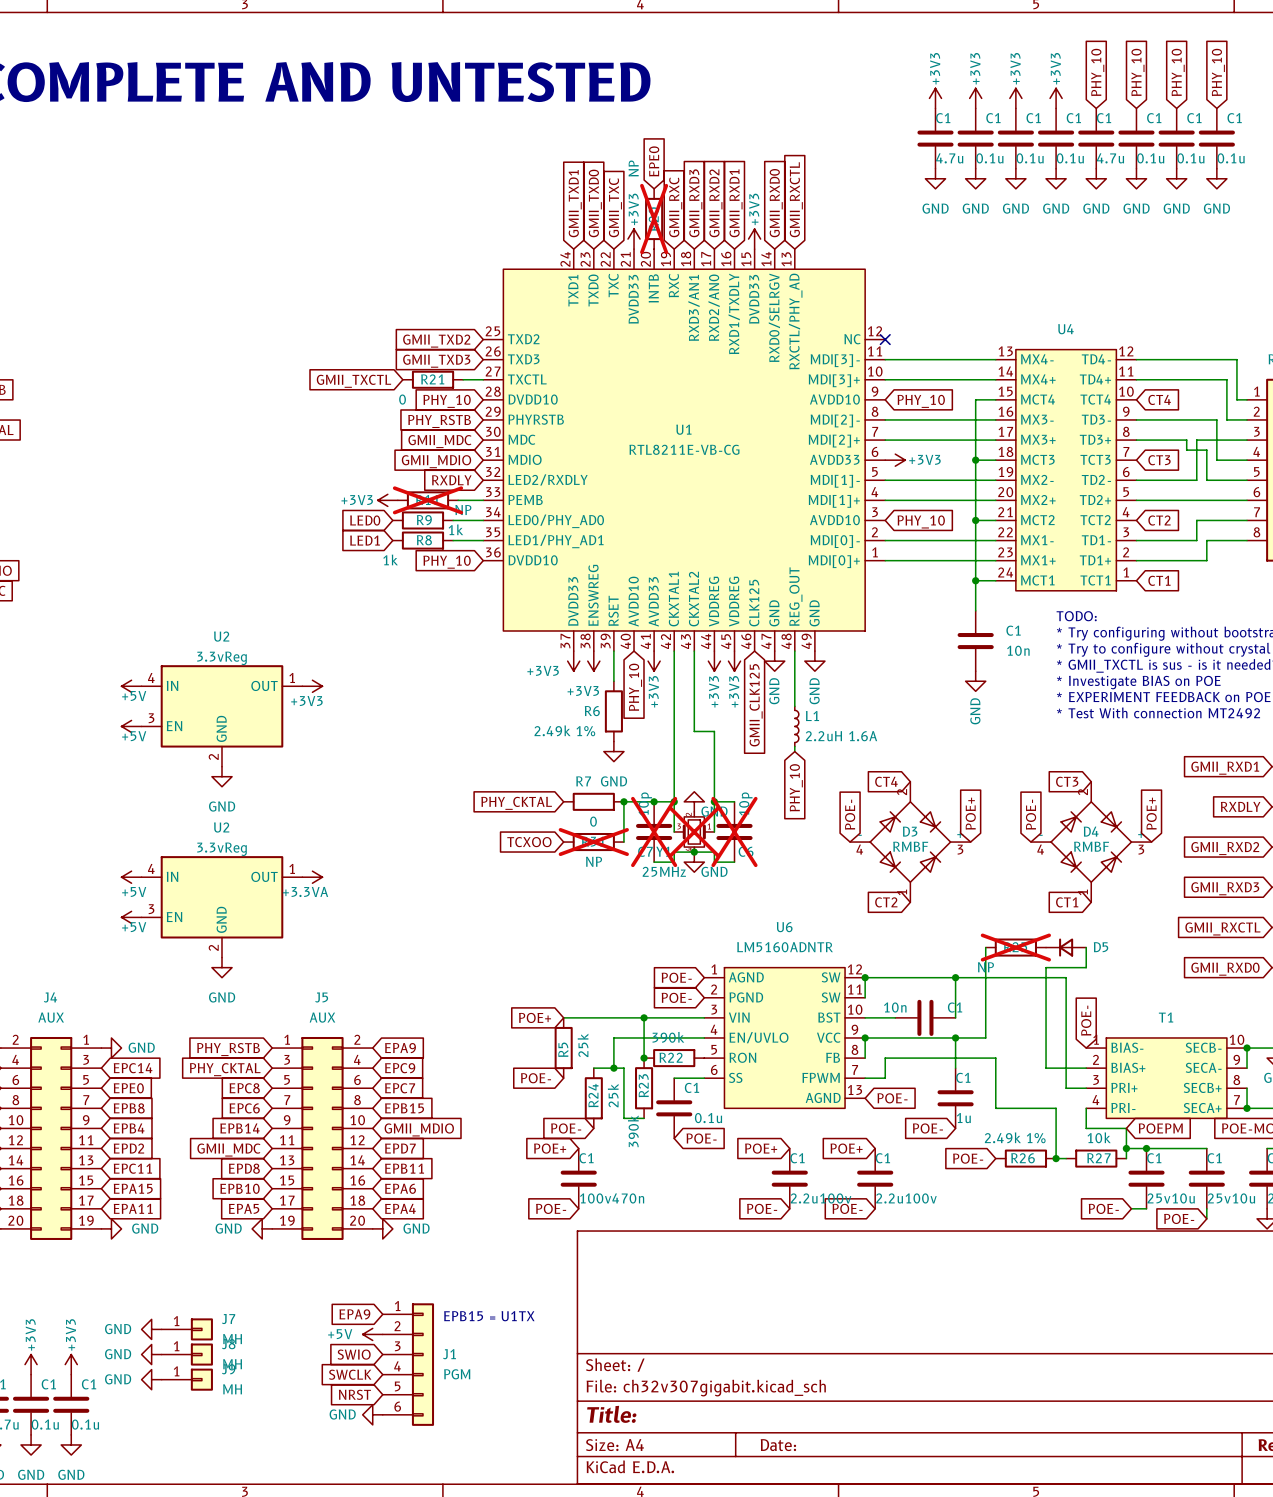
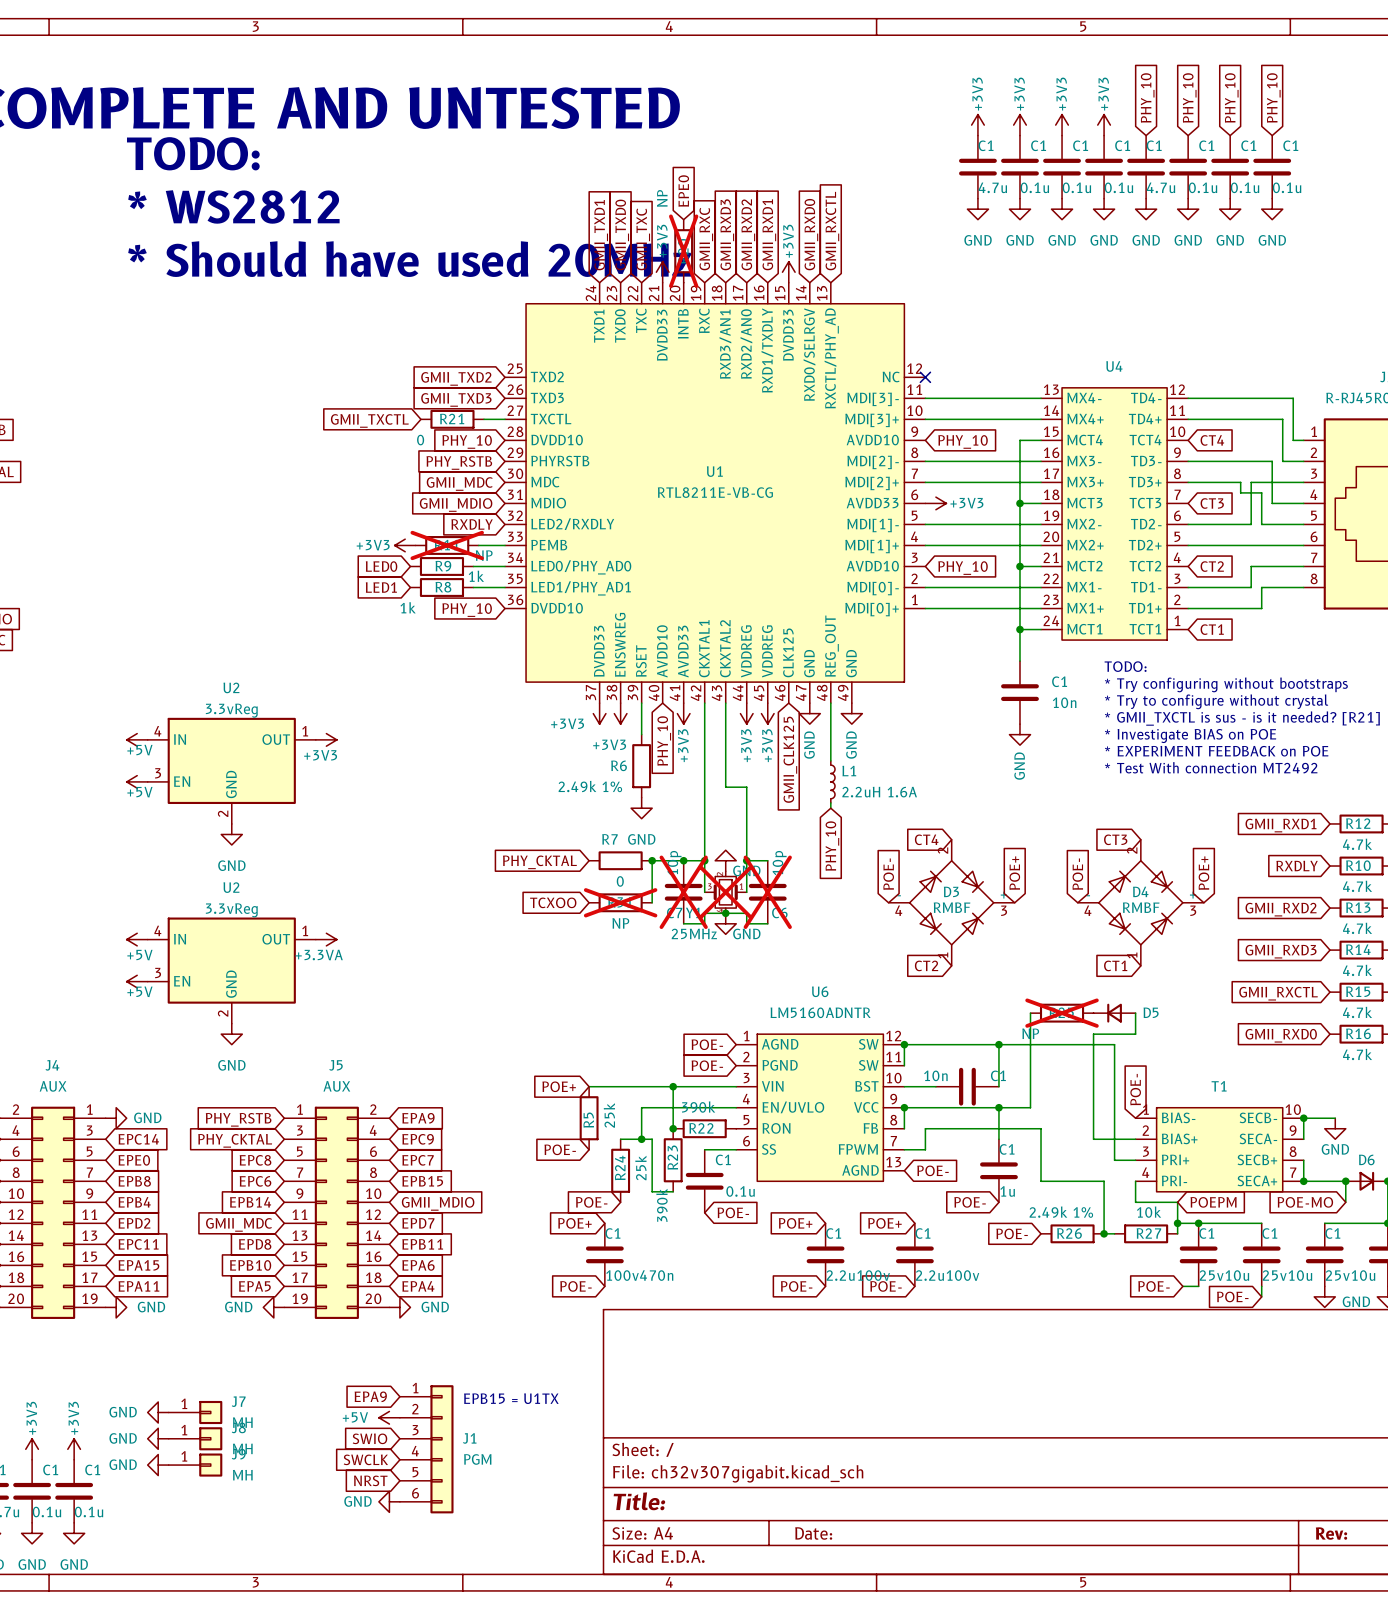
text: none -> TODO: (193, 153)
text: none -> * WS2812 (233, 206)
text: none -> * Should have used 20MHz (410, 259)

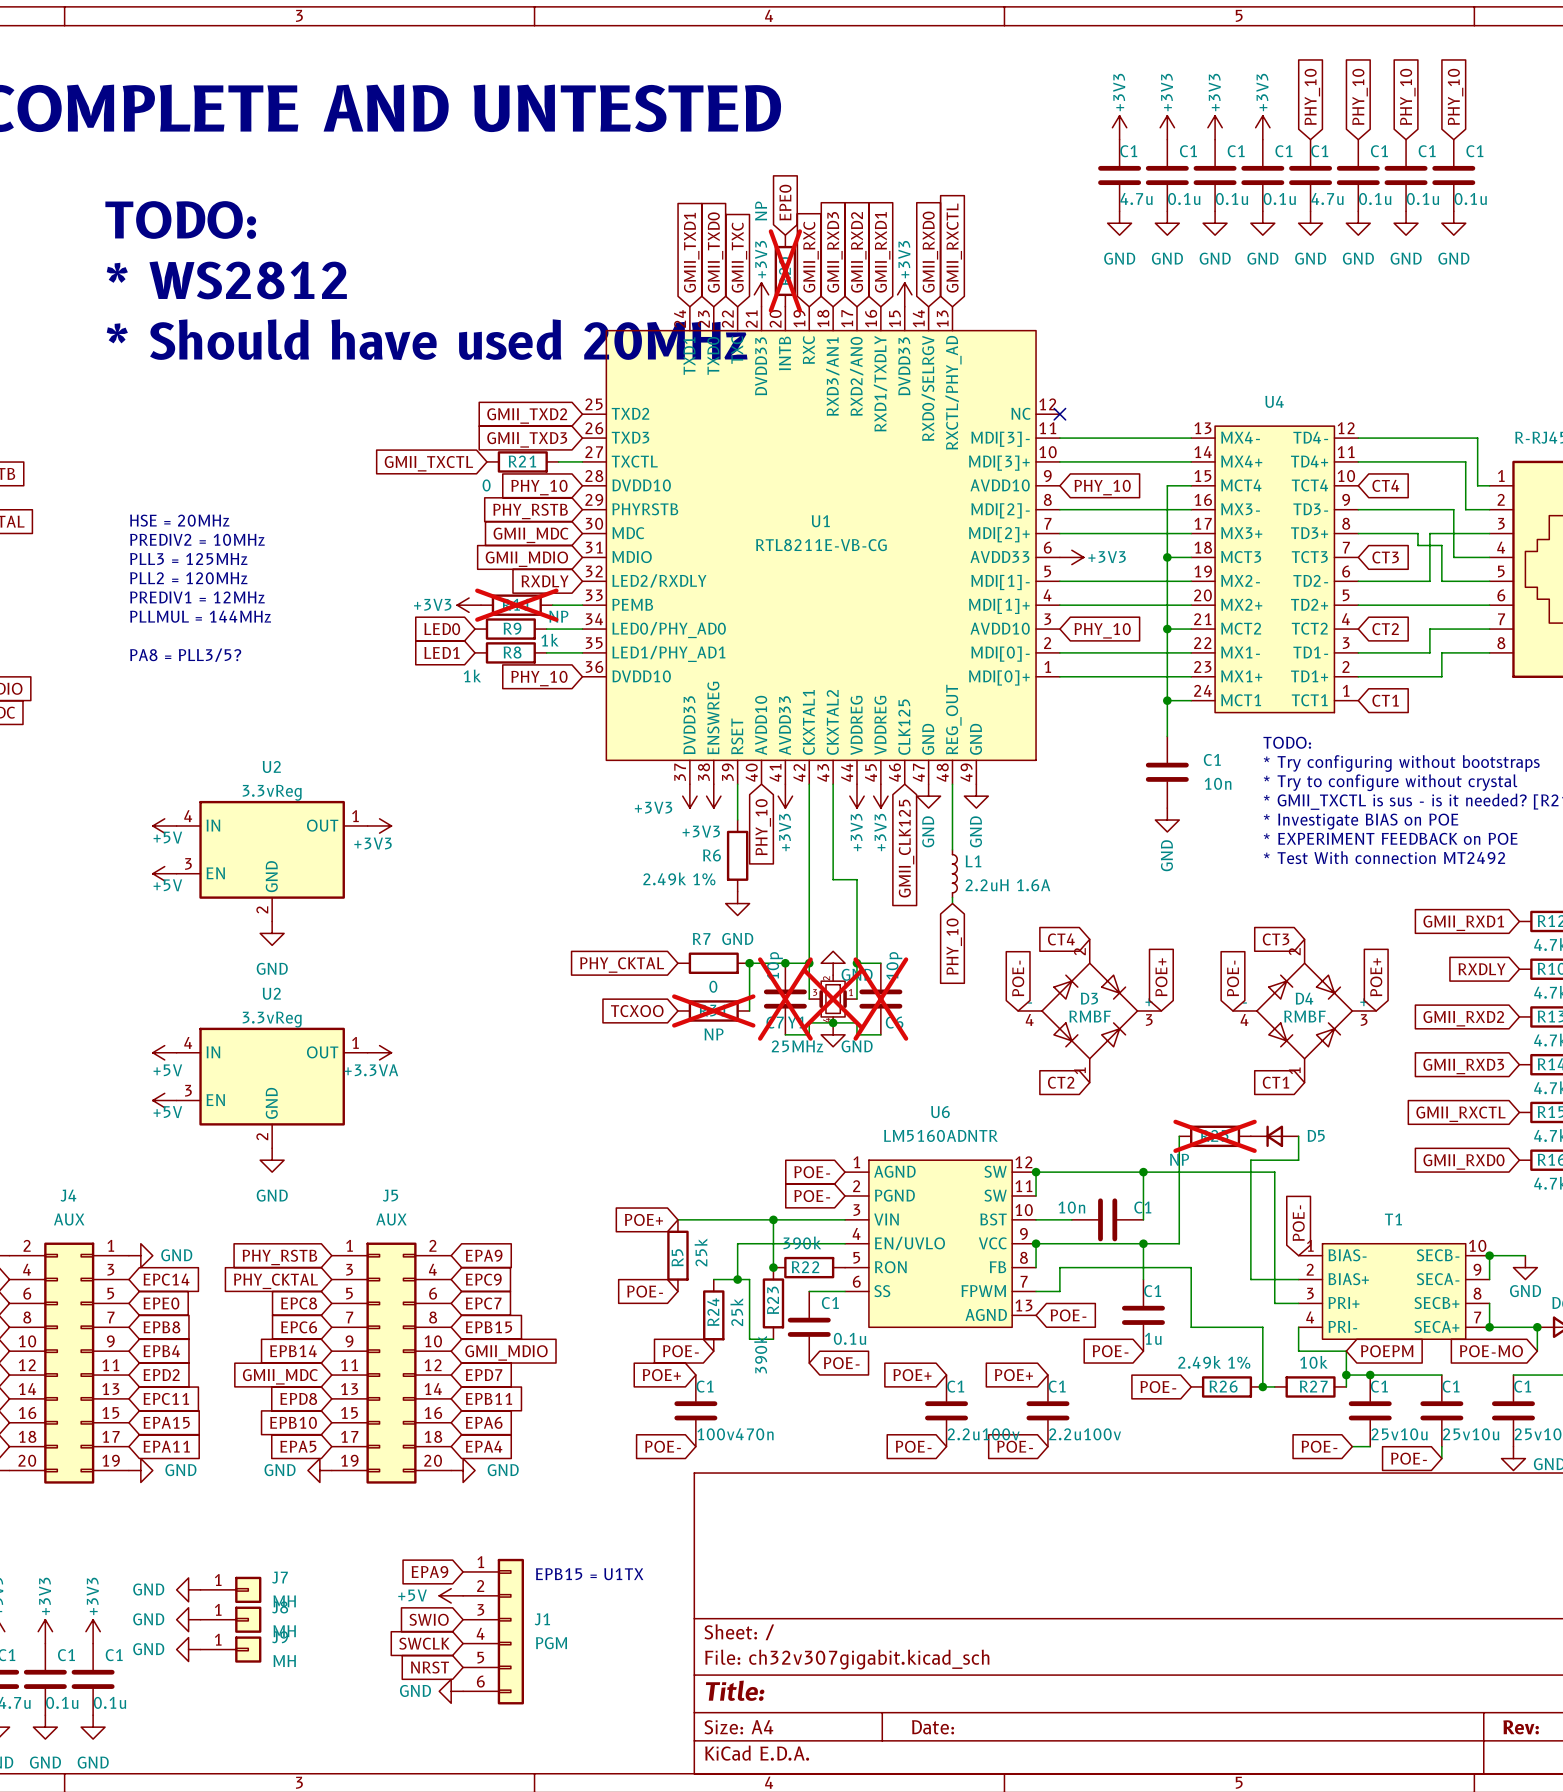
text position: TODO: (193, 153) -> TODO: (180, 219)
text position: * WS2812 (233, 206) -> * WS2812 (226, 280)
text position: * Should have used 20MHz (410, 259) -> * Should have used 20MHz (427, 339)
text: none -> HSE = 20MHz (179, 520)
text: none -> PREDIV2 = 10MHz (197, 539)
text: none -> PLL3 = 125MHz (188, 558)
text: none -> PLL2 = 120MHz (188, 578)
text: none -> PREDIV1 = 12MHz (197, 597)
text: none -> PLLMUL = 144MHz (200, 616)
text: none -> PA8 = PLL3/5? (185, 655)

